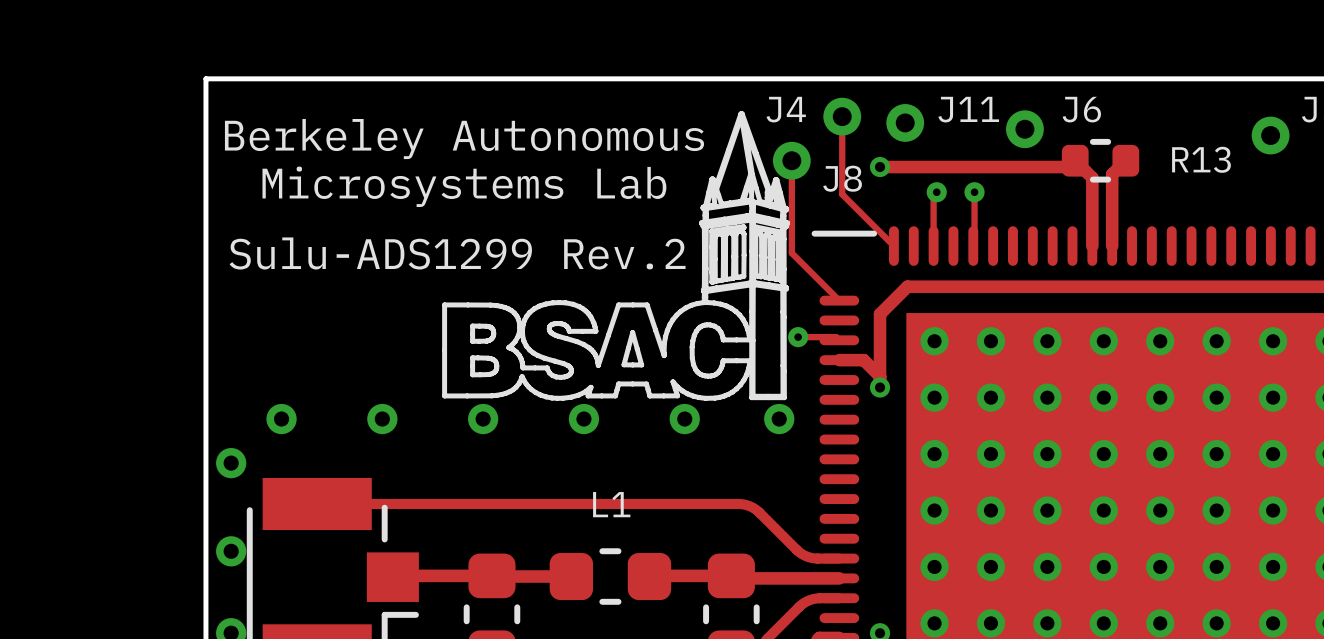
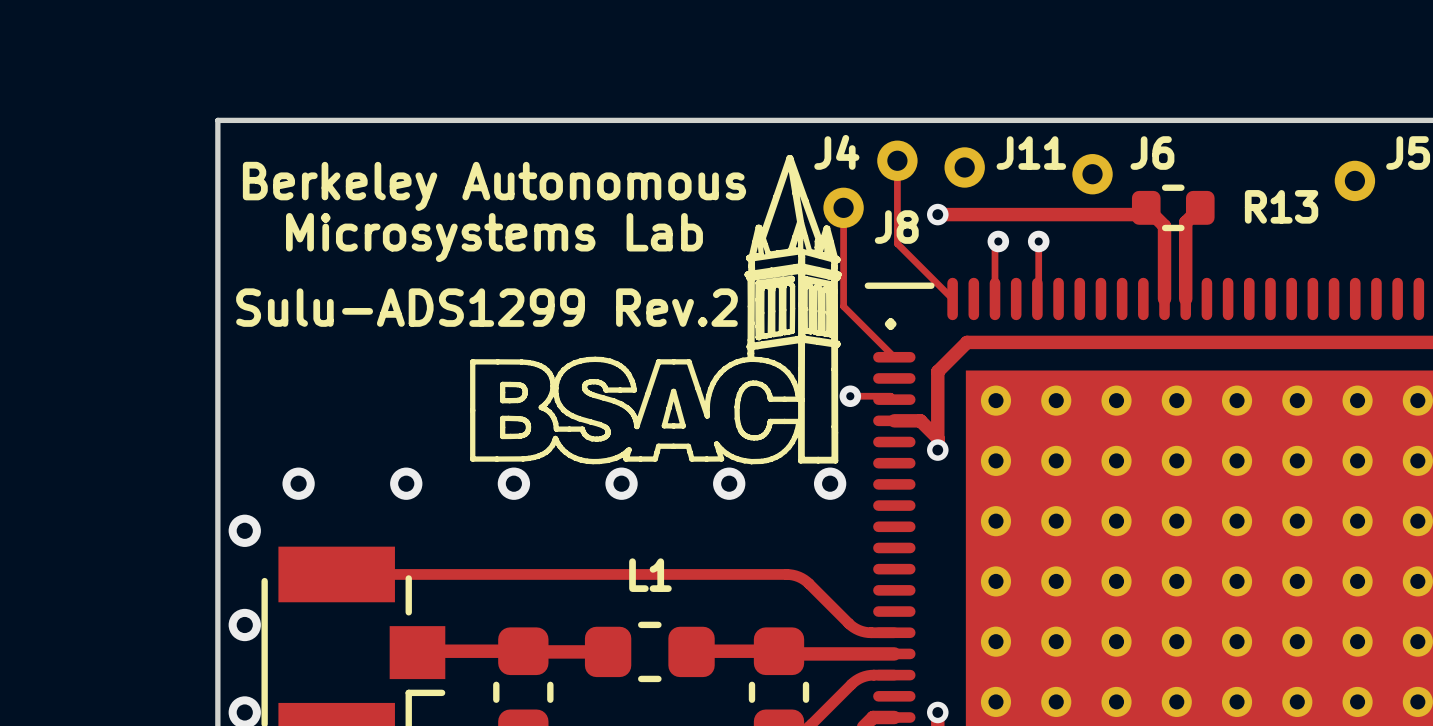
text: none -> . (890, 324)

